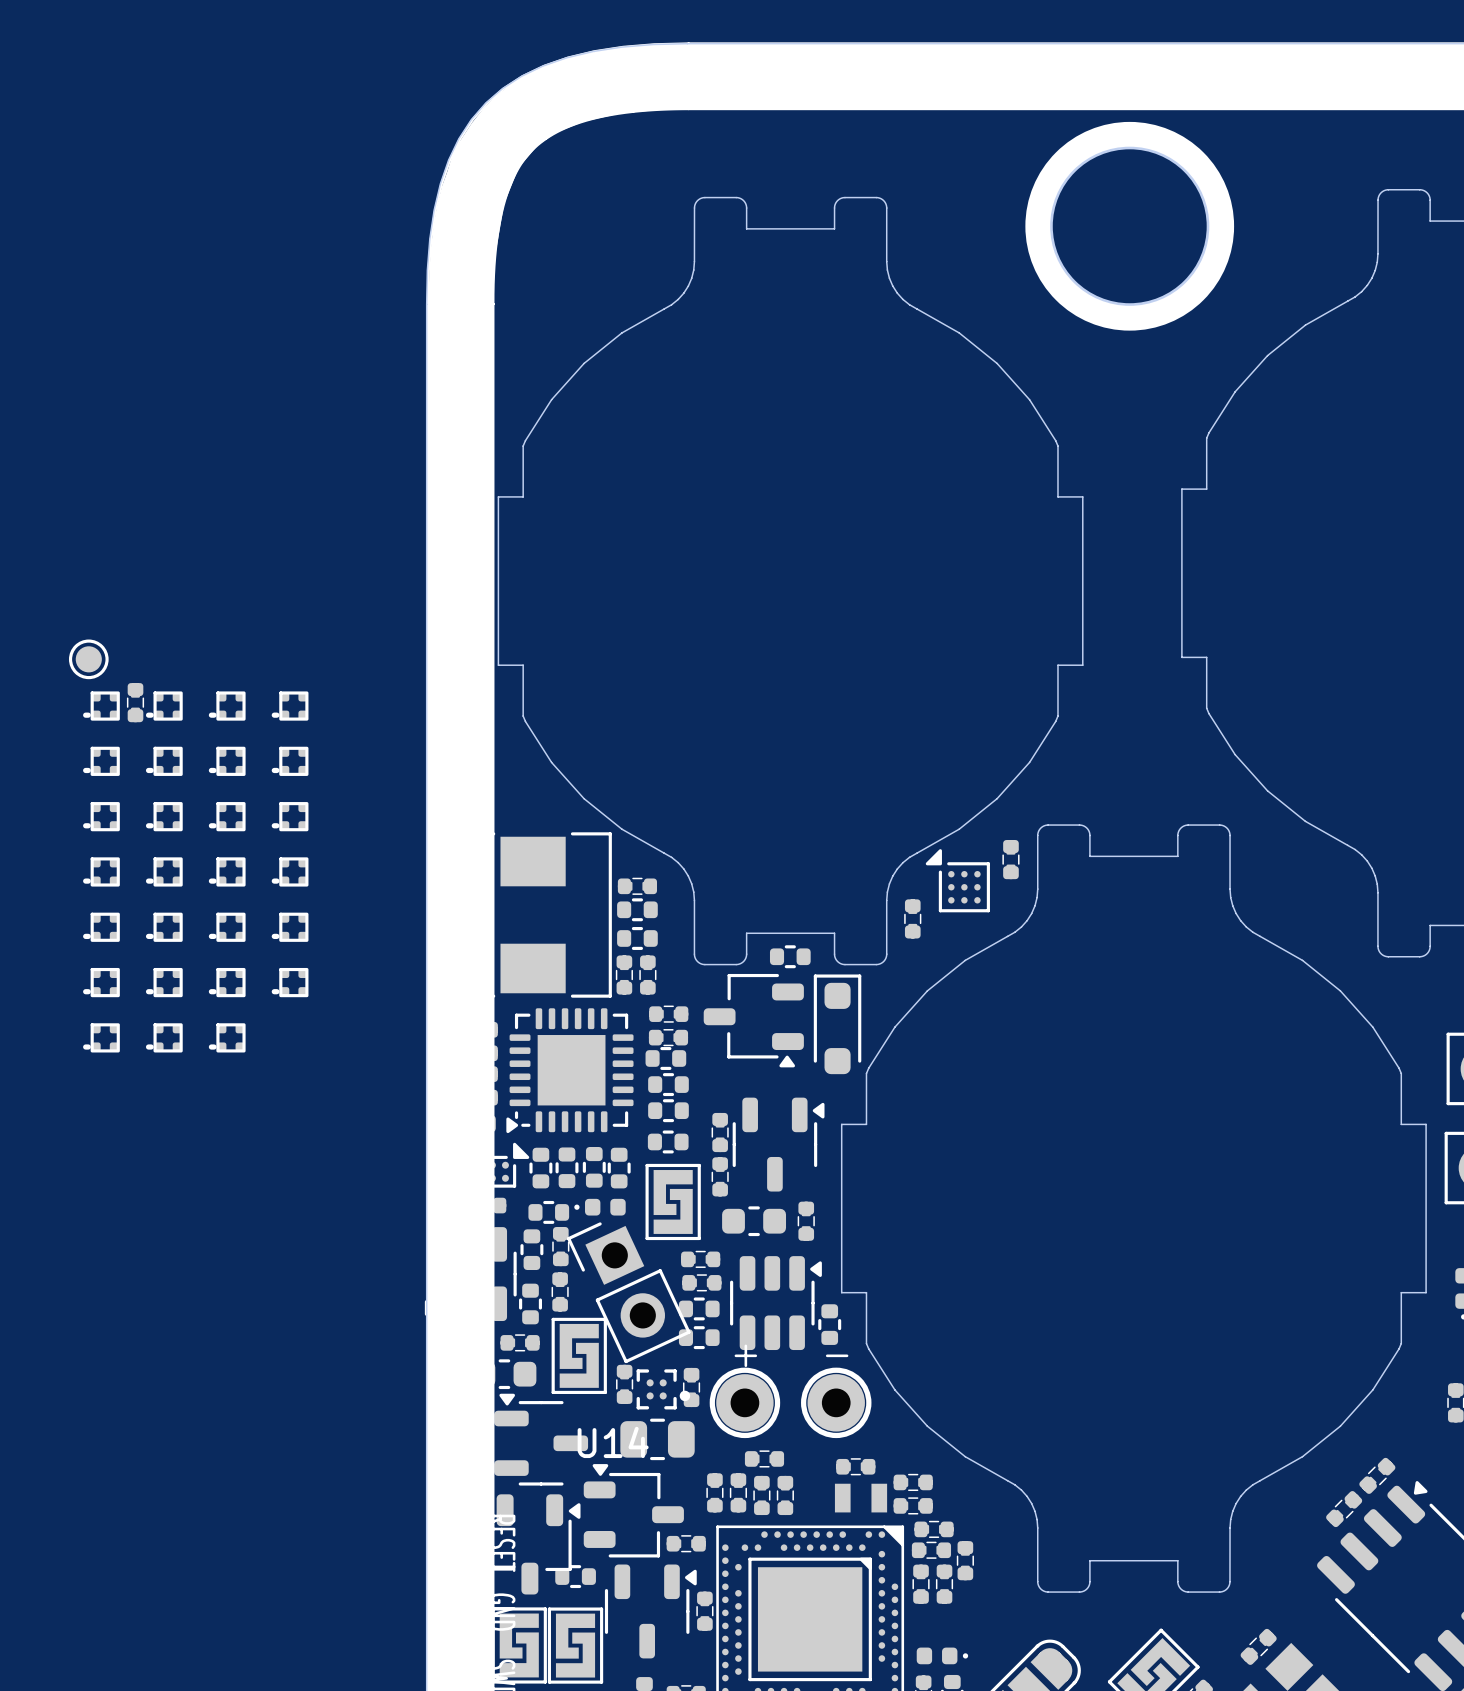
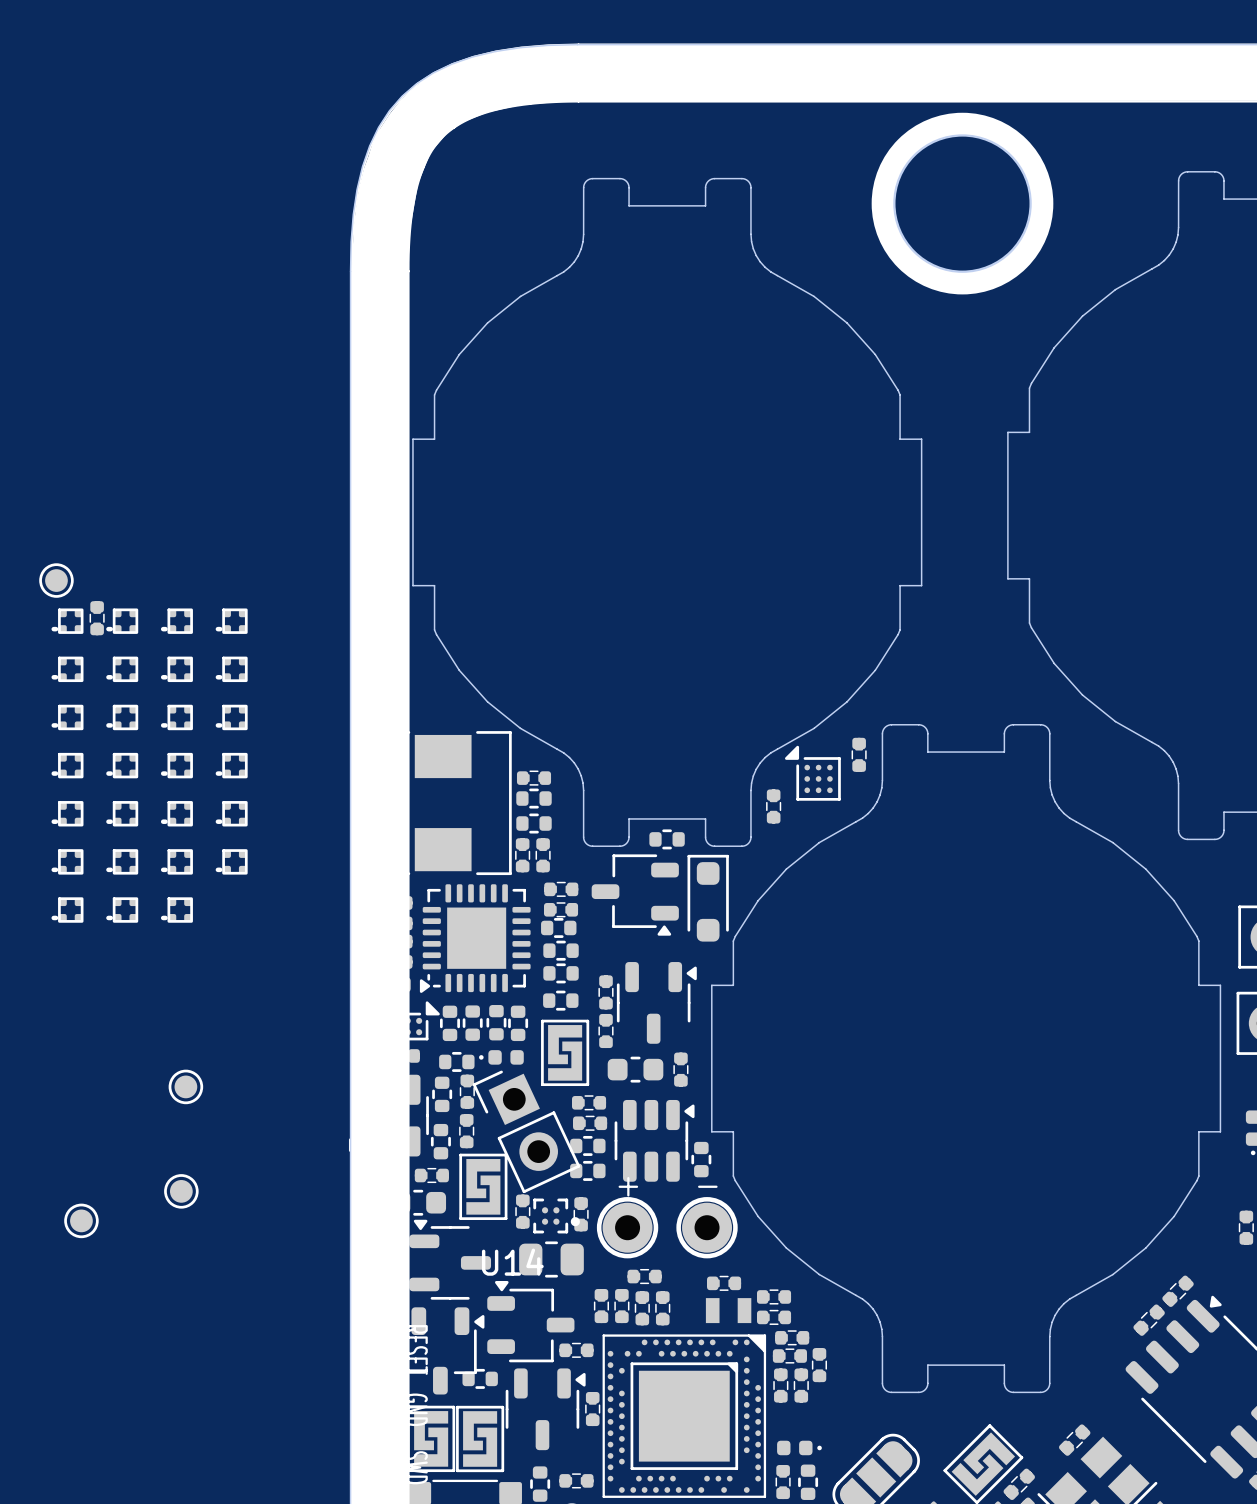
part: none -> (185, 1086)
part: none -> (181, 1191)
part: none -> (81, 1220)

